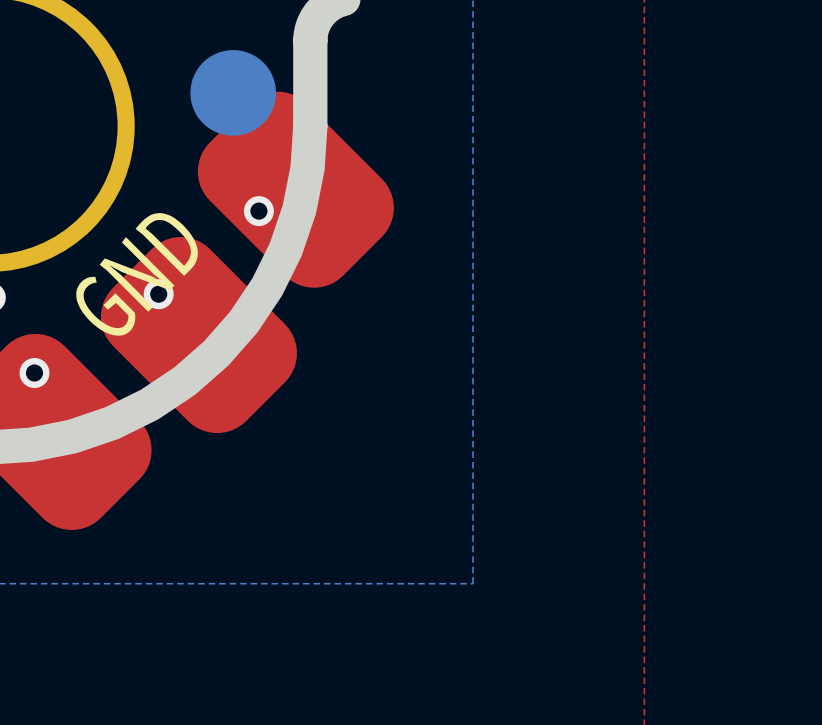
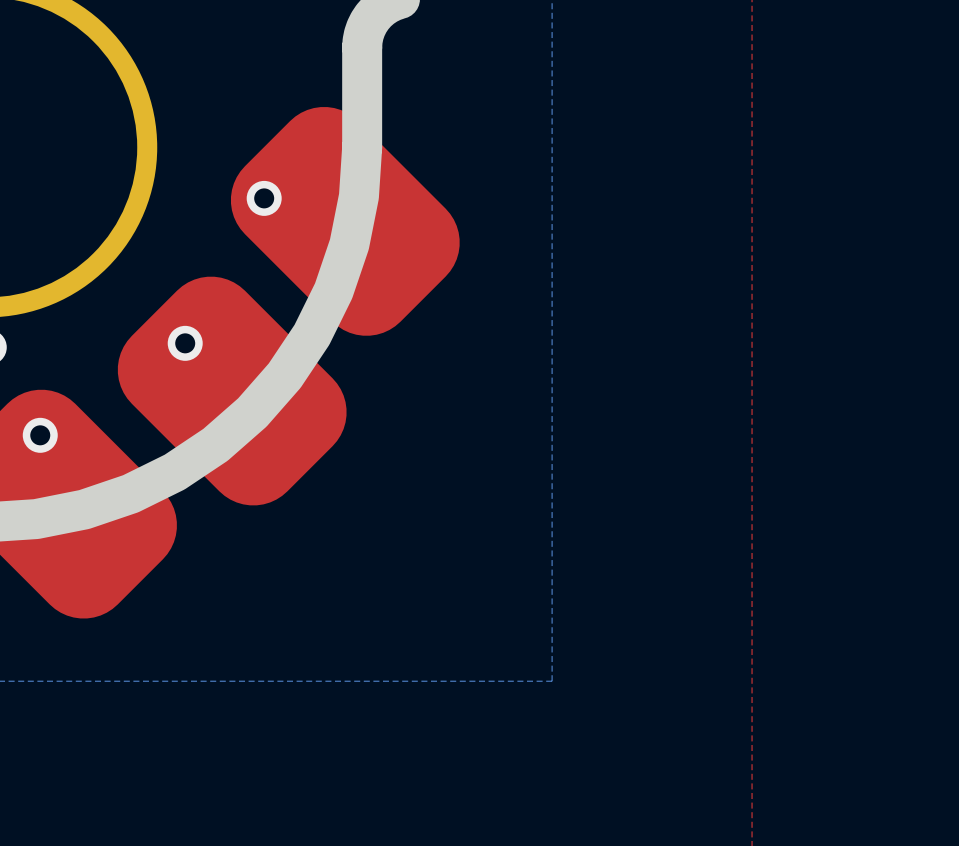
part: (233, 92) -> none
via position: (258, 211) -> (264, 198)
text: GND (136, 274) -> none

